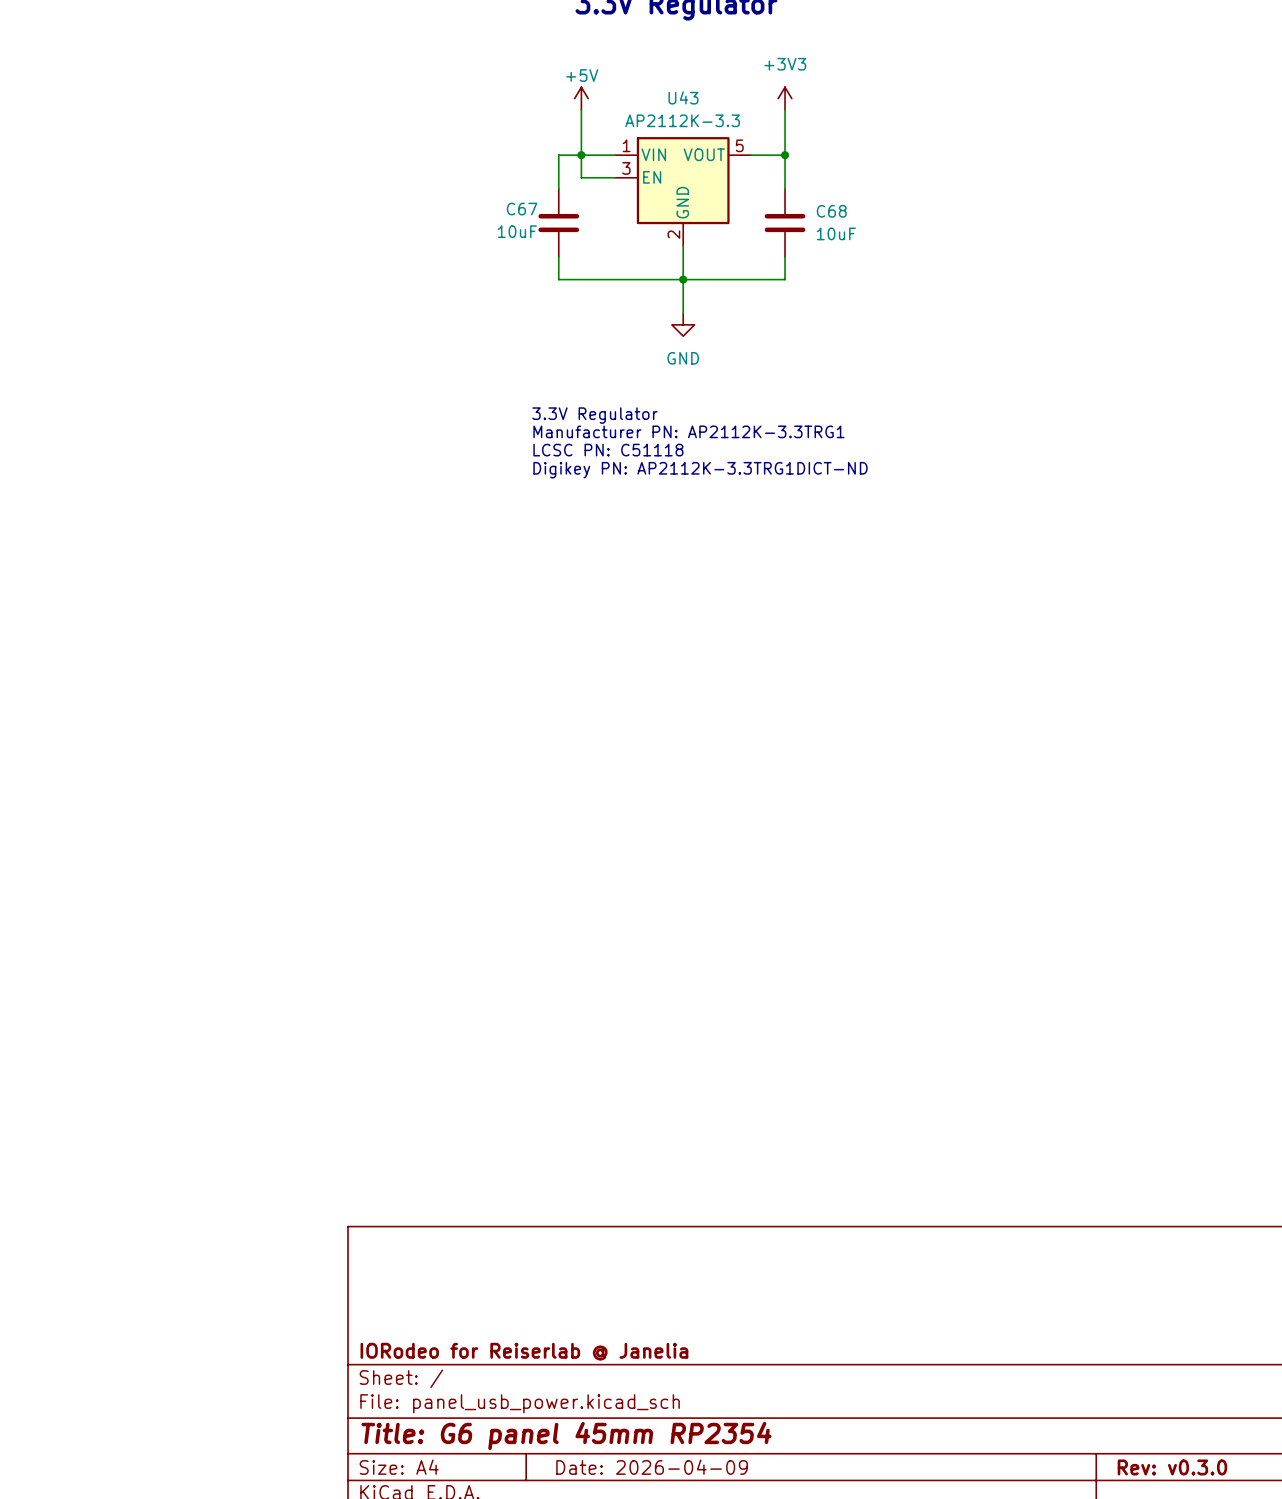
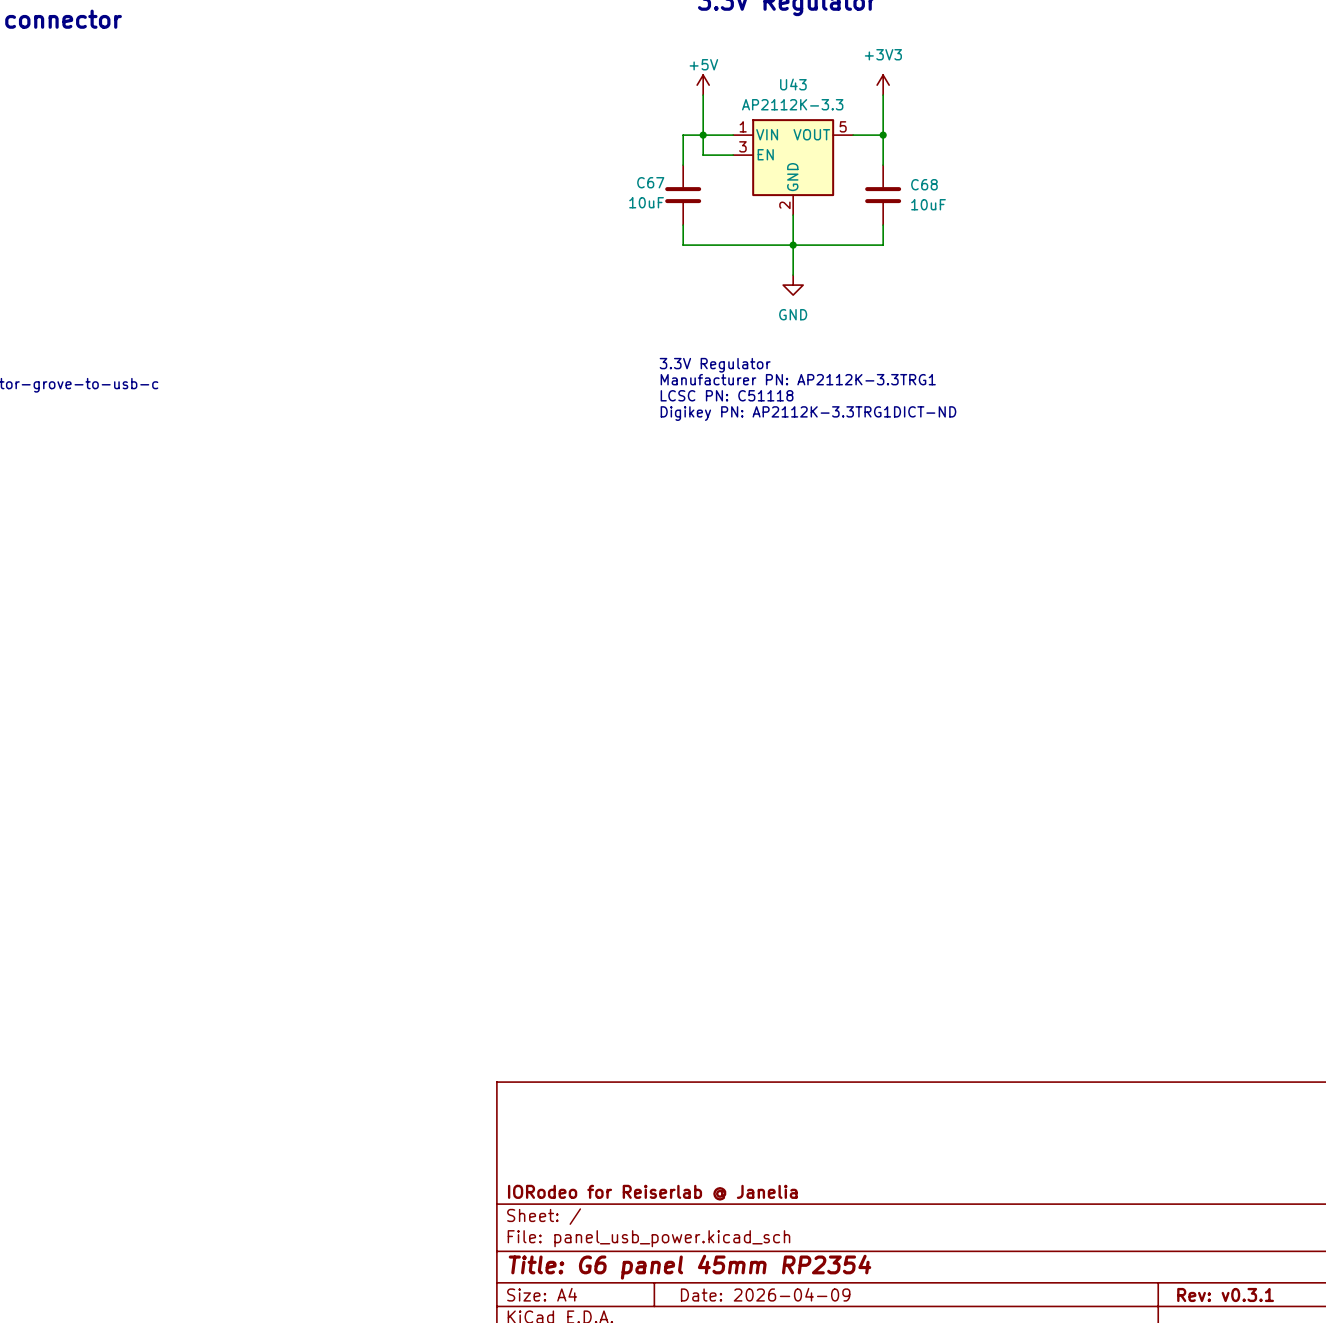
title block: Rev: v0.3.0 (1172, 1467) -> Rev: v0.3.1 (1225, 1294)

